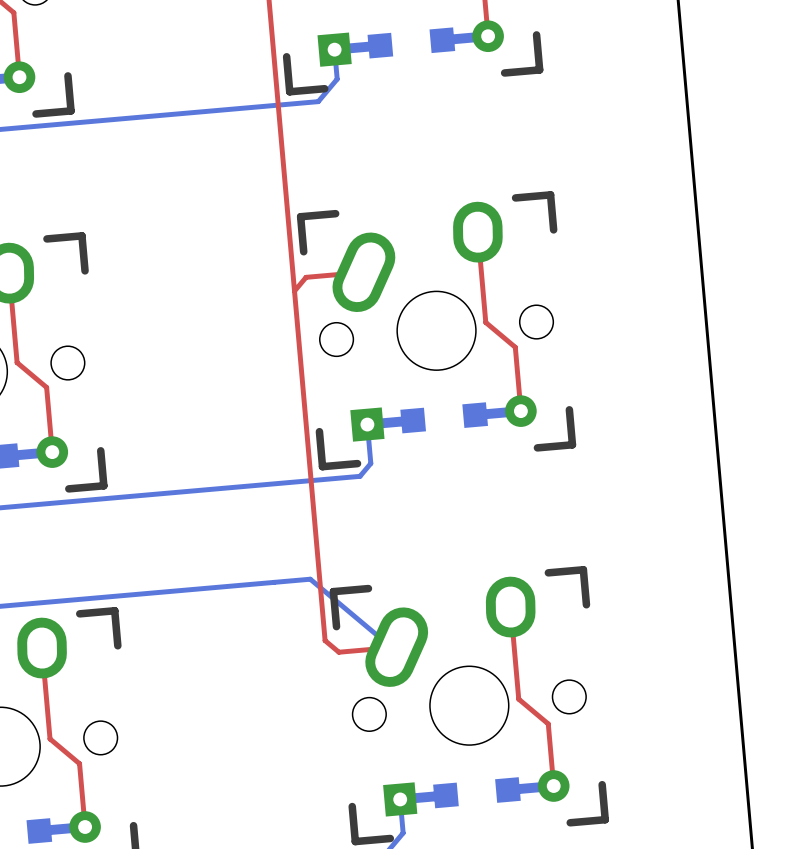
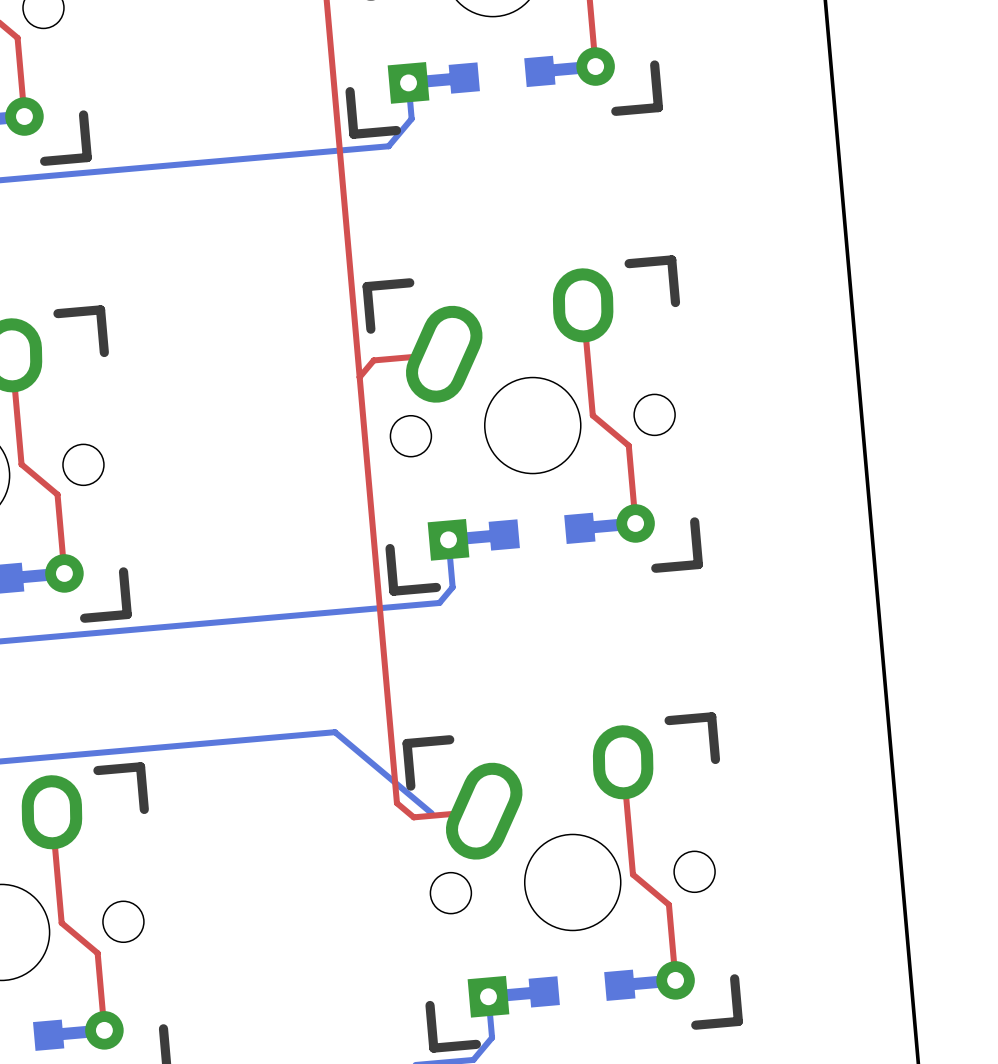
bottom track: (274, 582) (310, 579) (391, 647) (396, 647) -> (335, 732) (431, 813)

